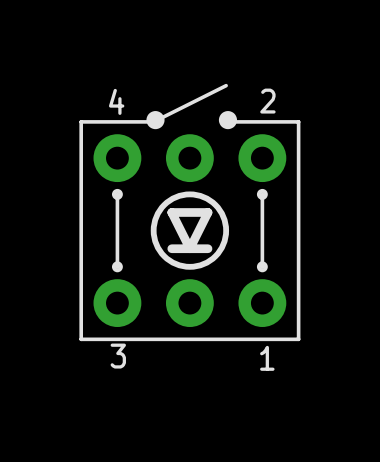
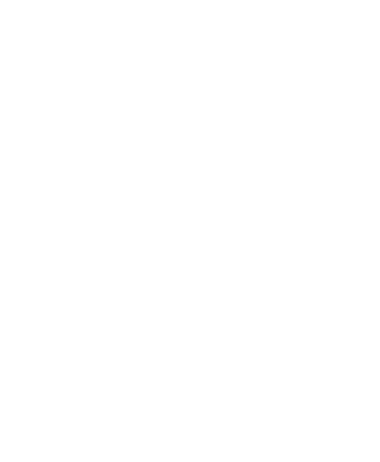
part: (189, 212) -> none

